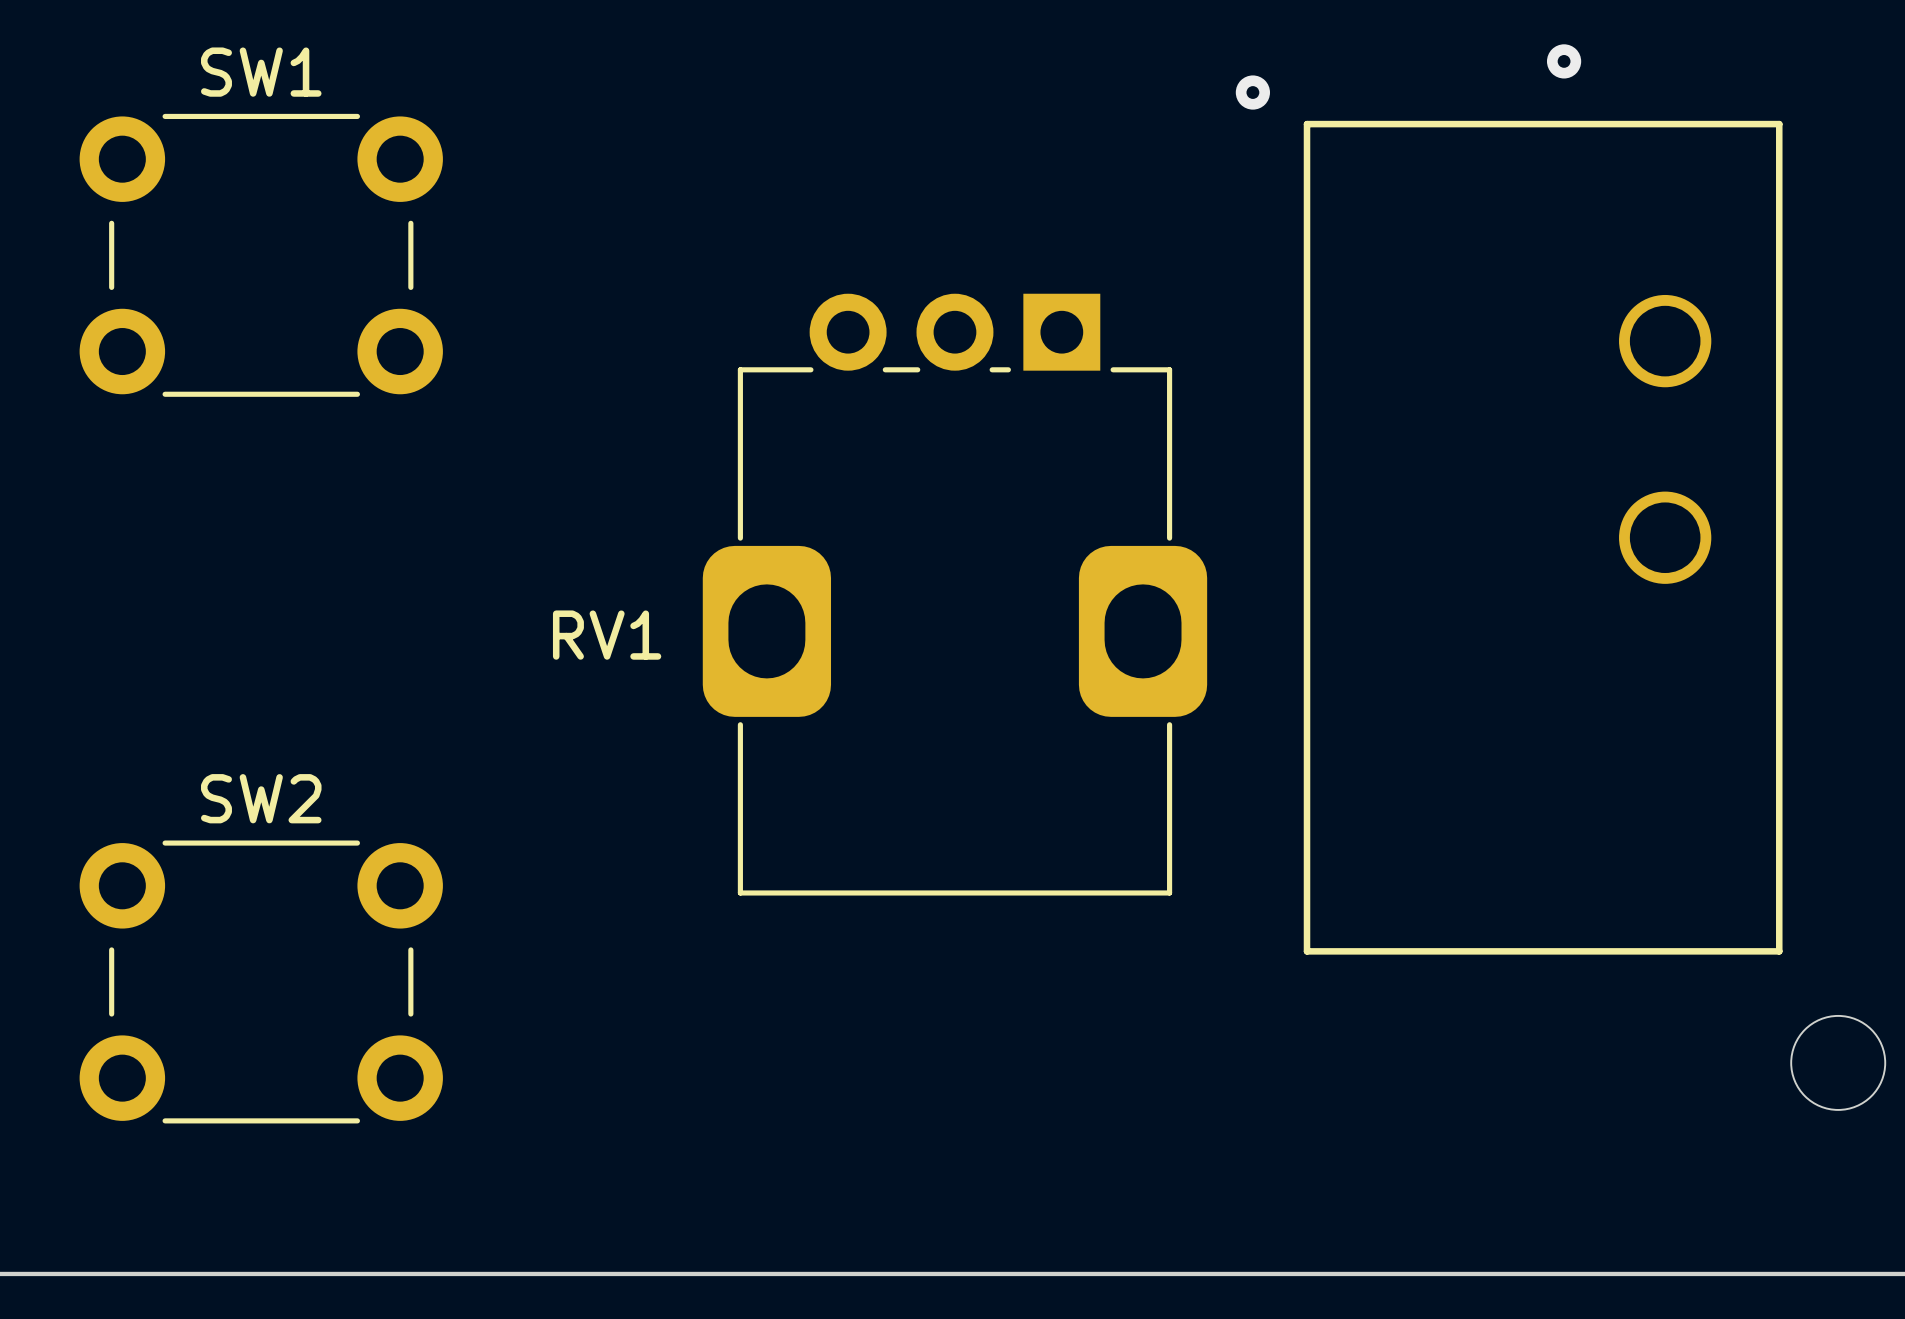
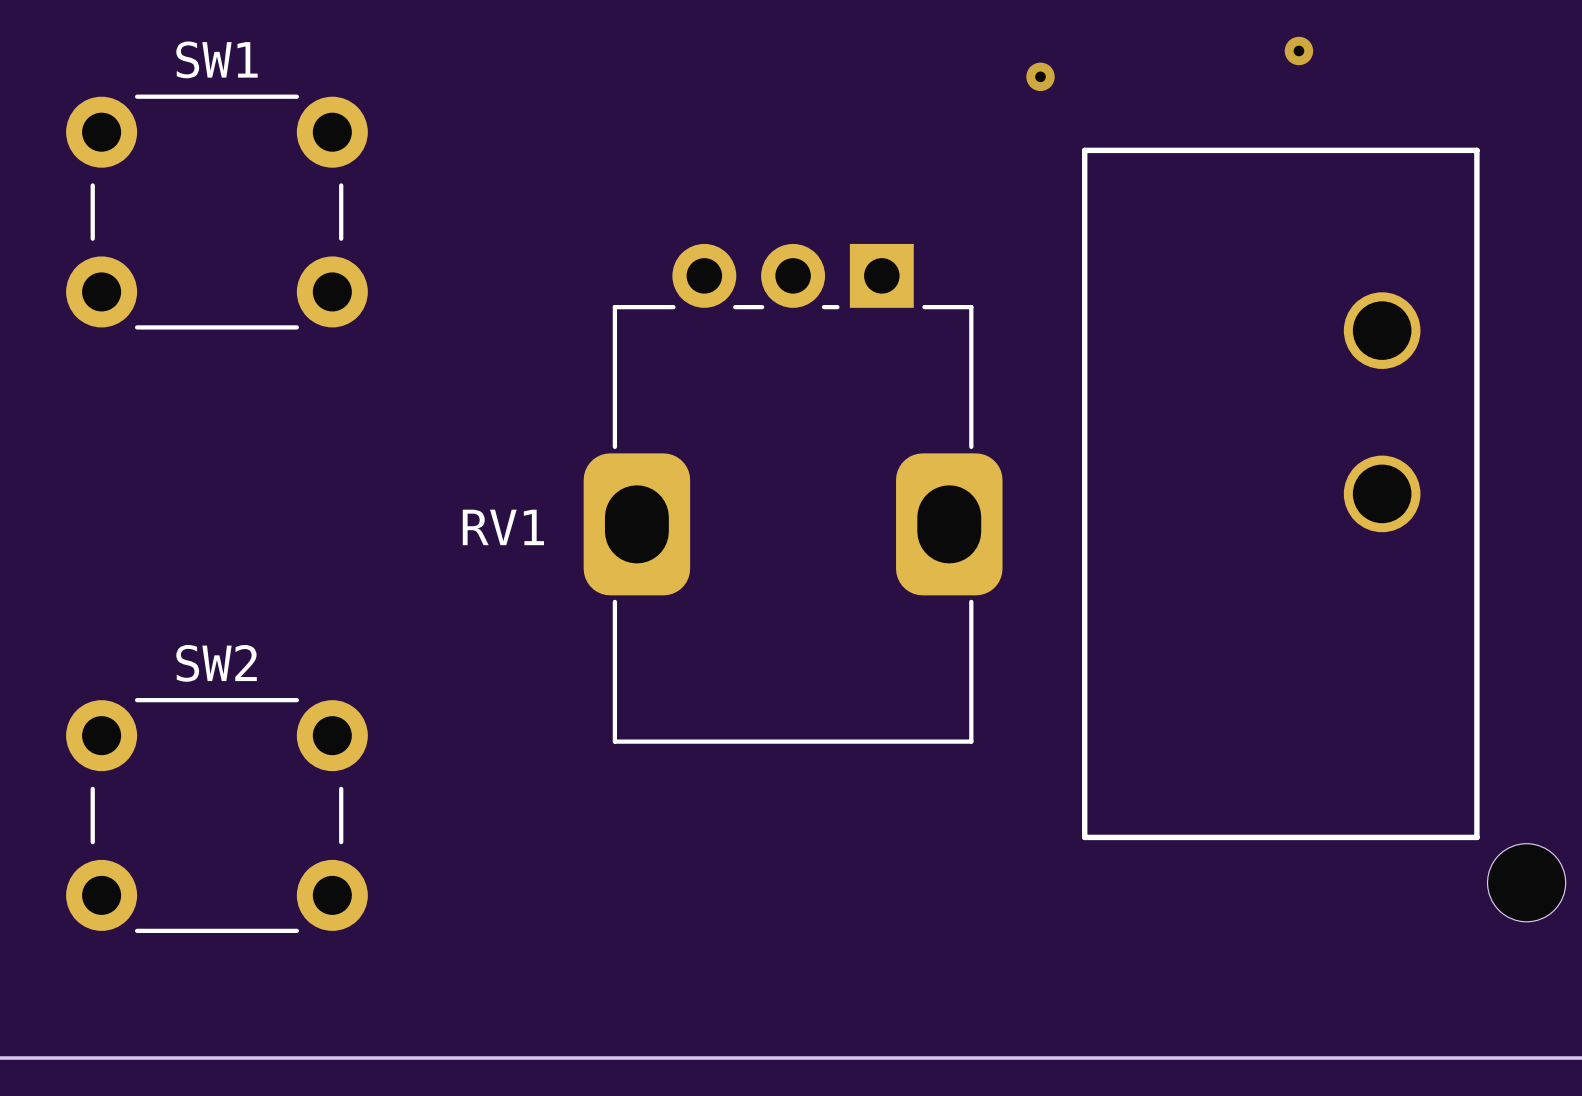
part position: (1543, 537) -> (1280, 493)

